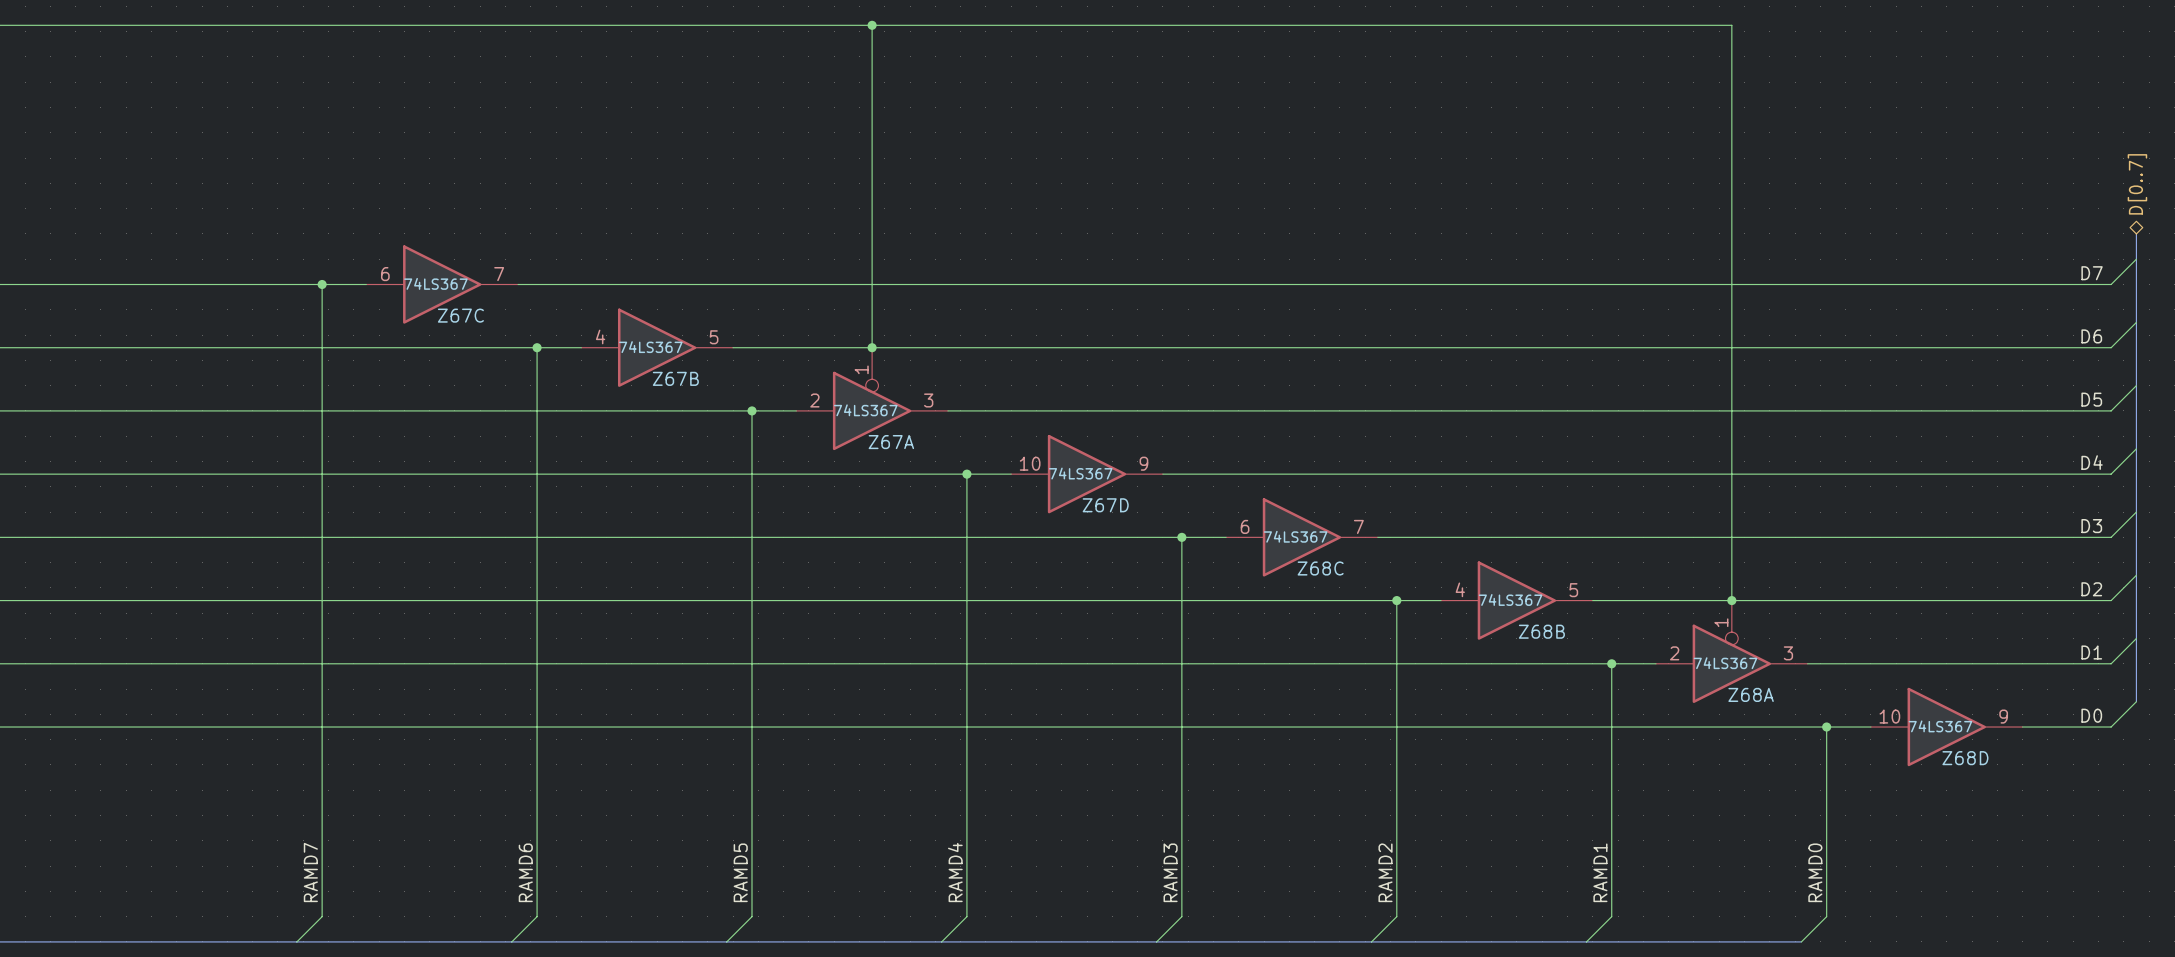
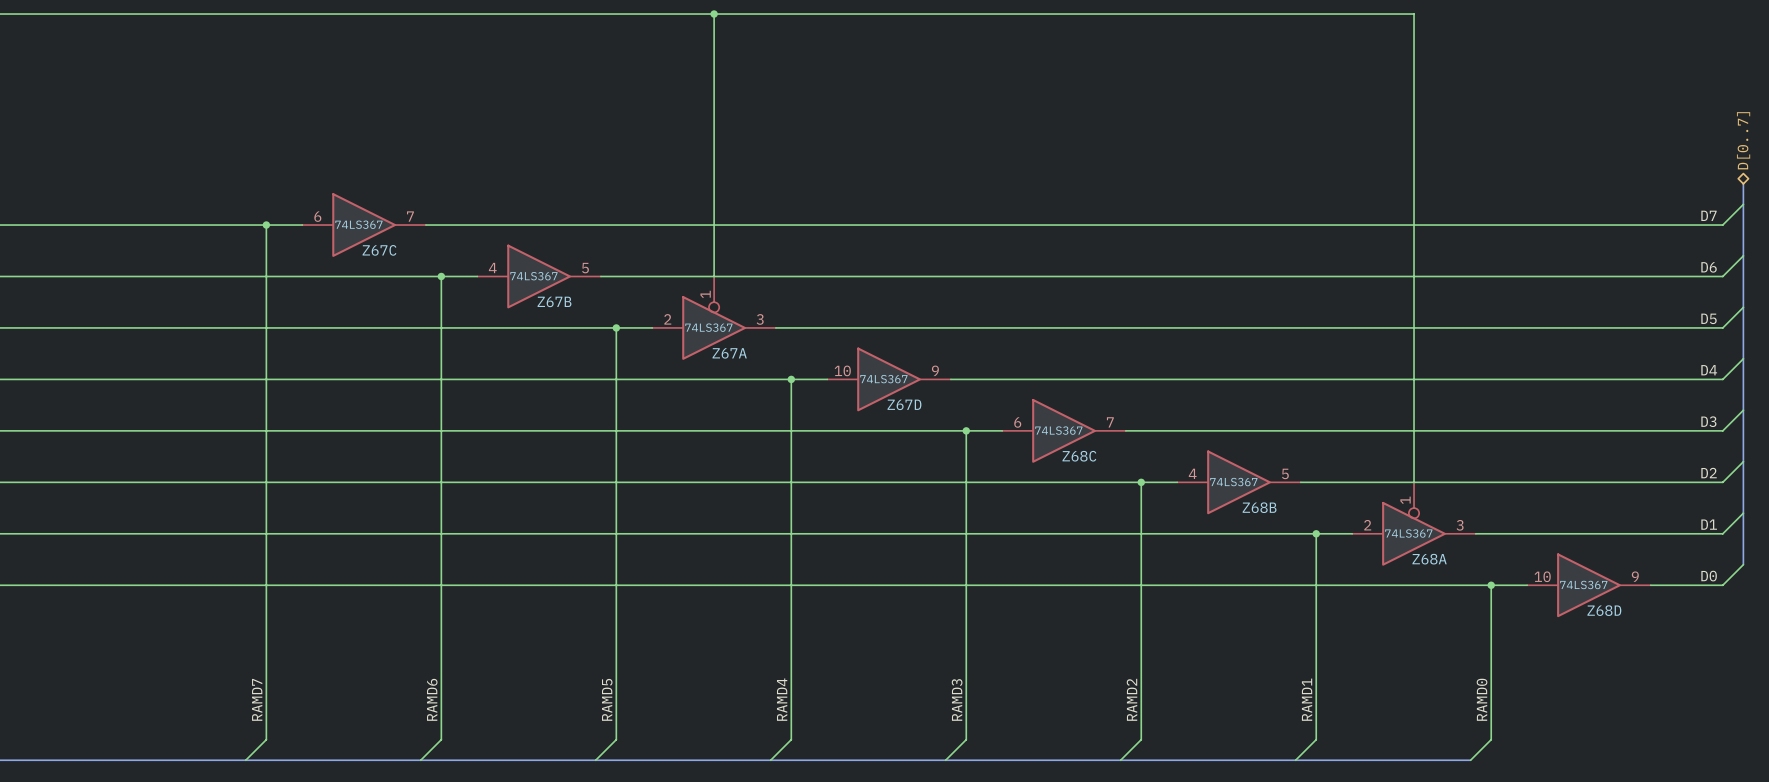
junction: (872, 347) -> none
junction: (1731, 600) -> none

